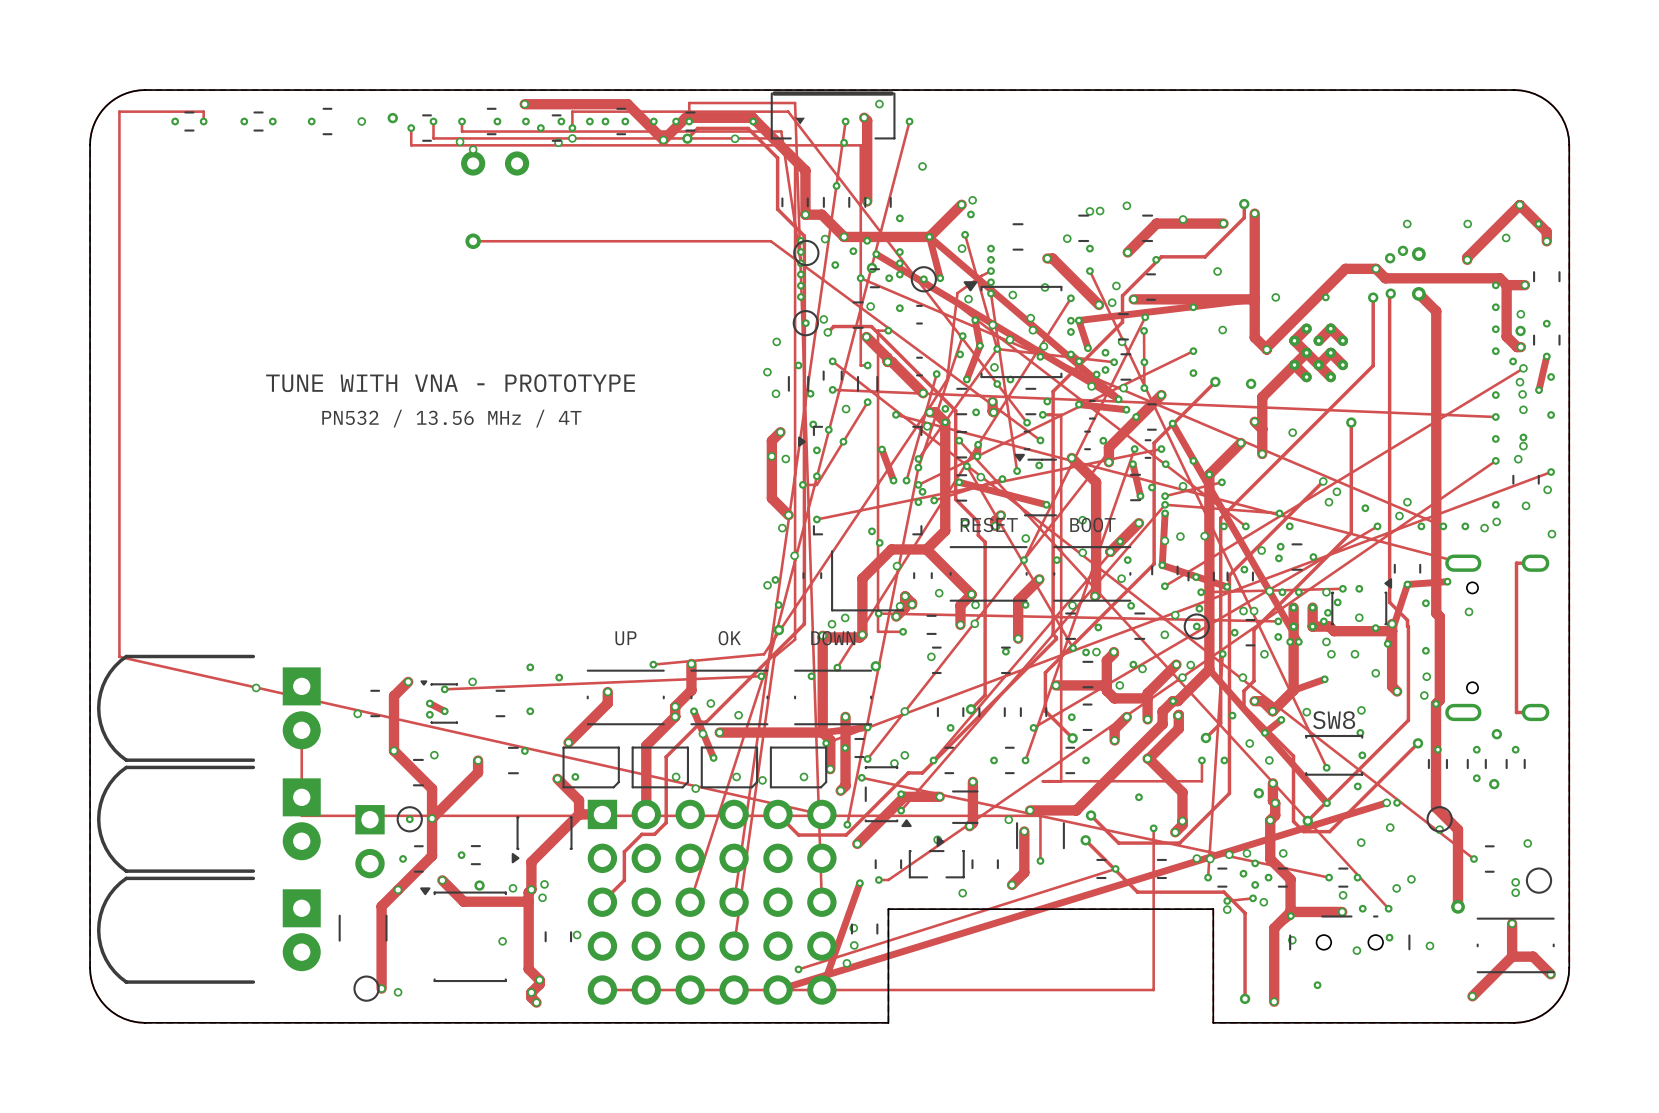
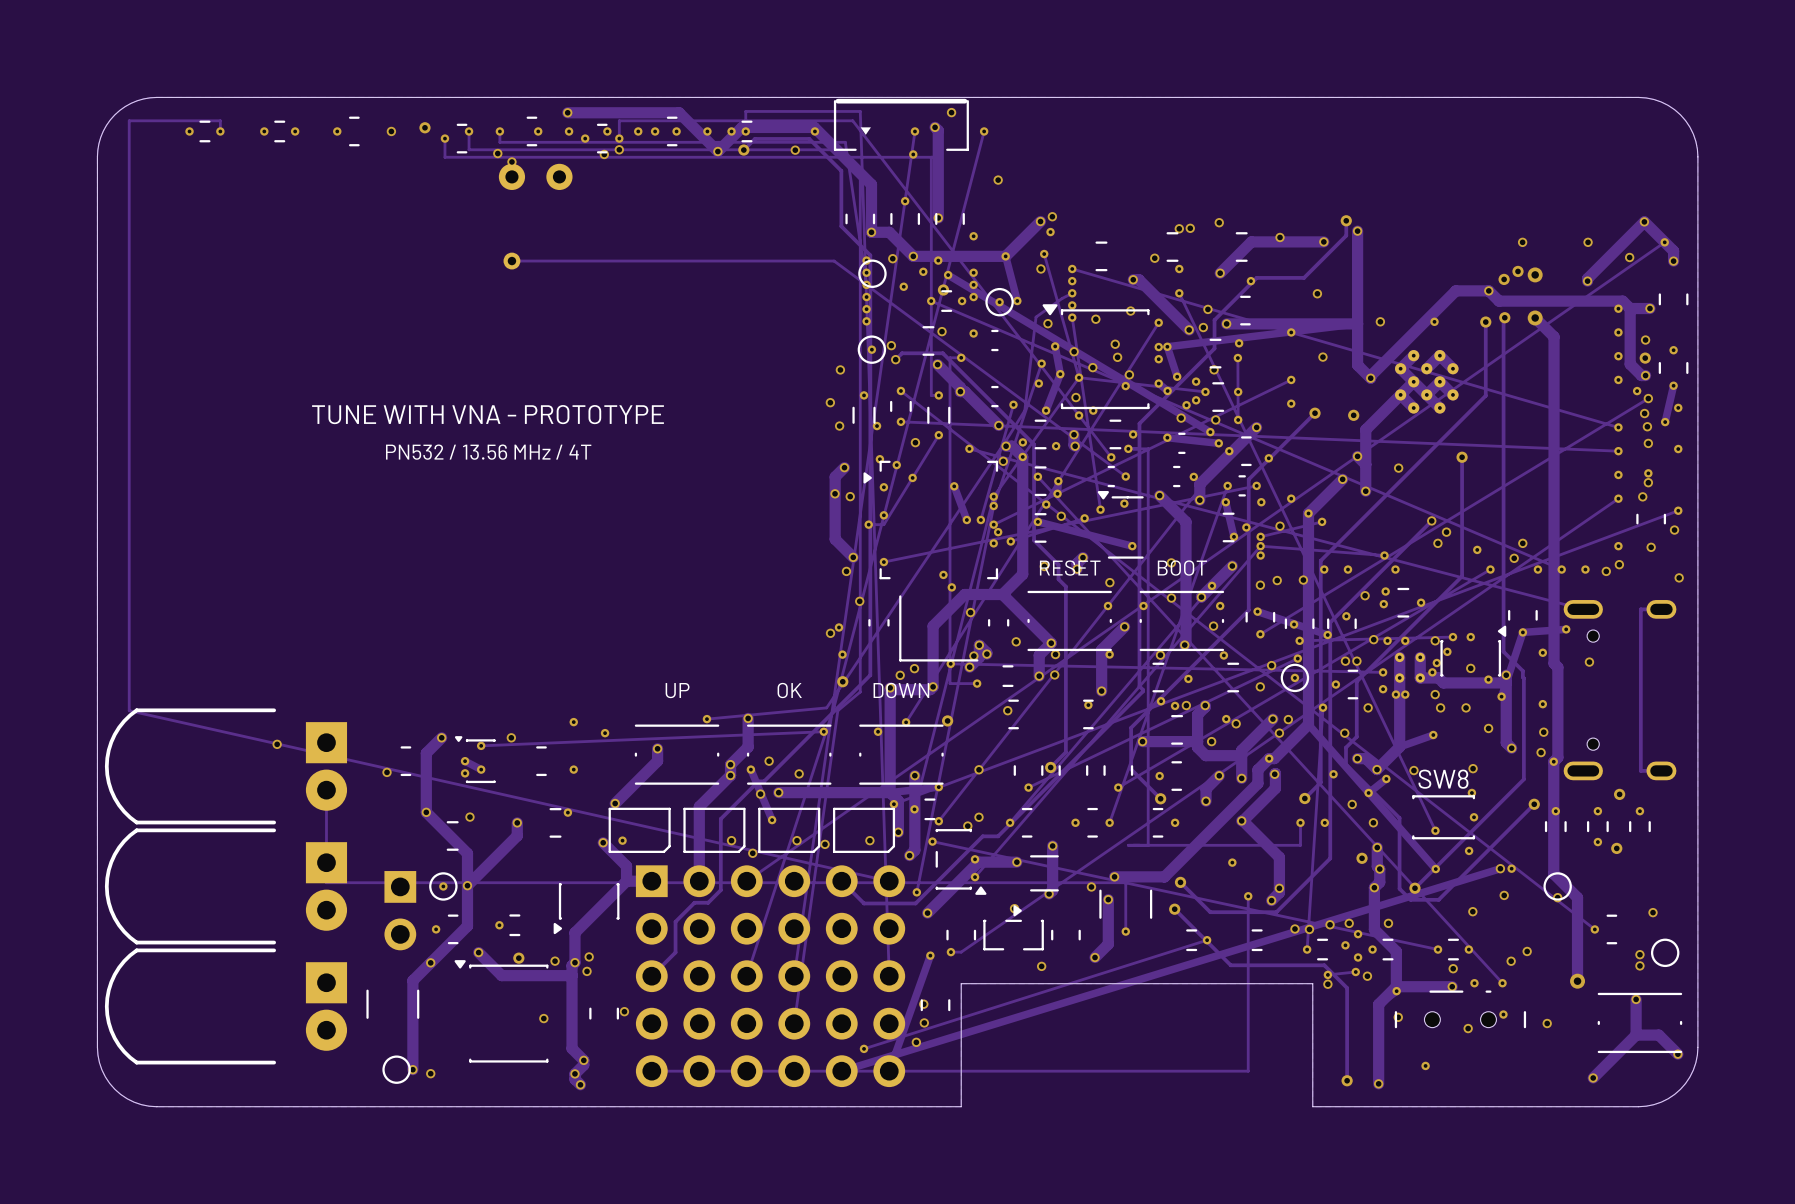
track: none -> (1664, 242) (746, 881)
track: (929, 236) (1118, 399) -> none
track: none -> (1072, 268) (1618, 427)
track: (923, 279) (1245, 526) -> none
track: (1145, 317) (1024, 560) -> none
track: (1172, 423) (1298, 641) -> none
track: none -> (993, 496) (914, 809)
track: (966, 466) (1073, 648) -> none
track: (1165, 513) (1162, 565) -> none
track: none -> (1297, 658) (1028, 787)

